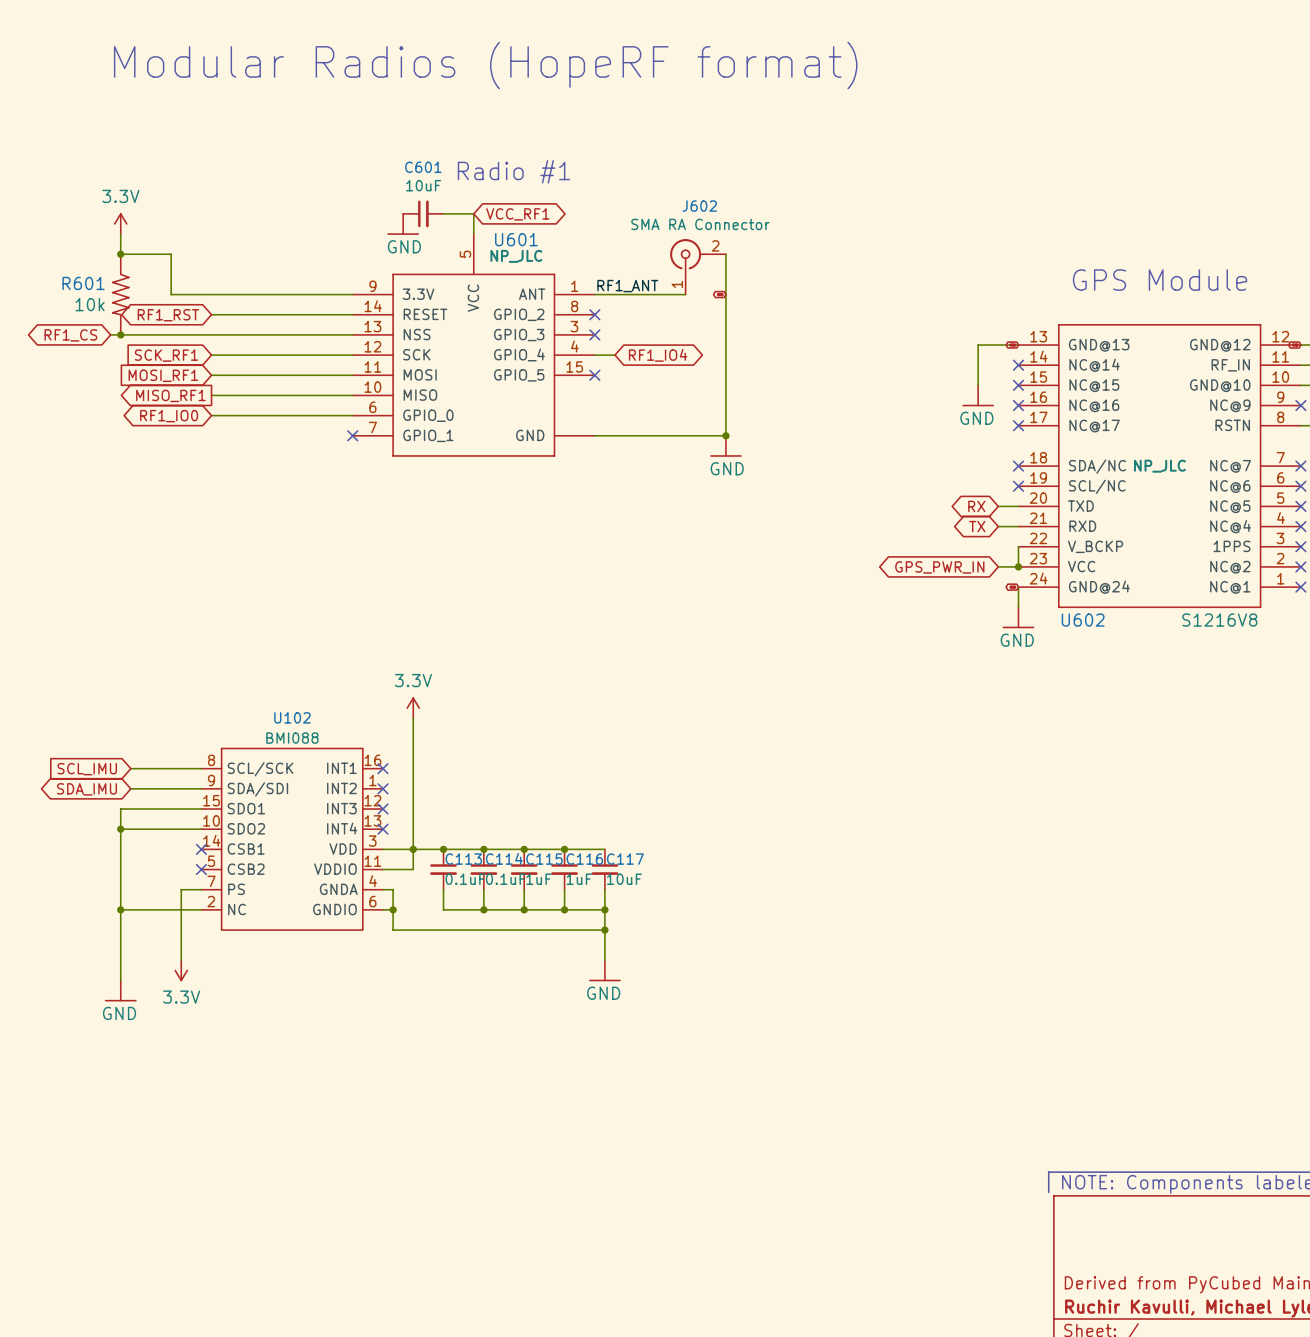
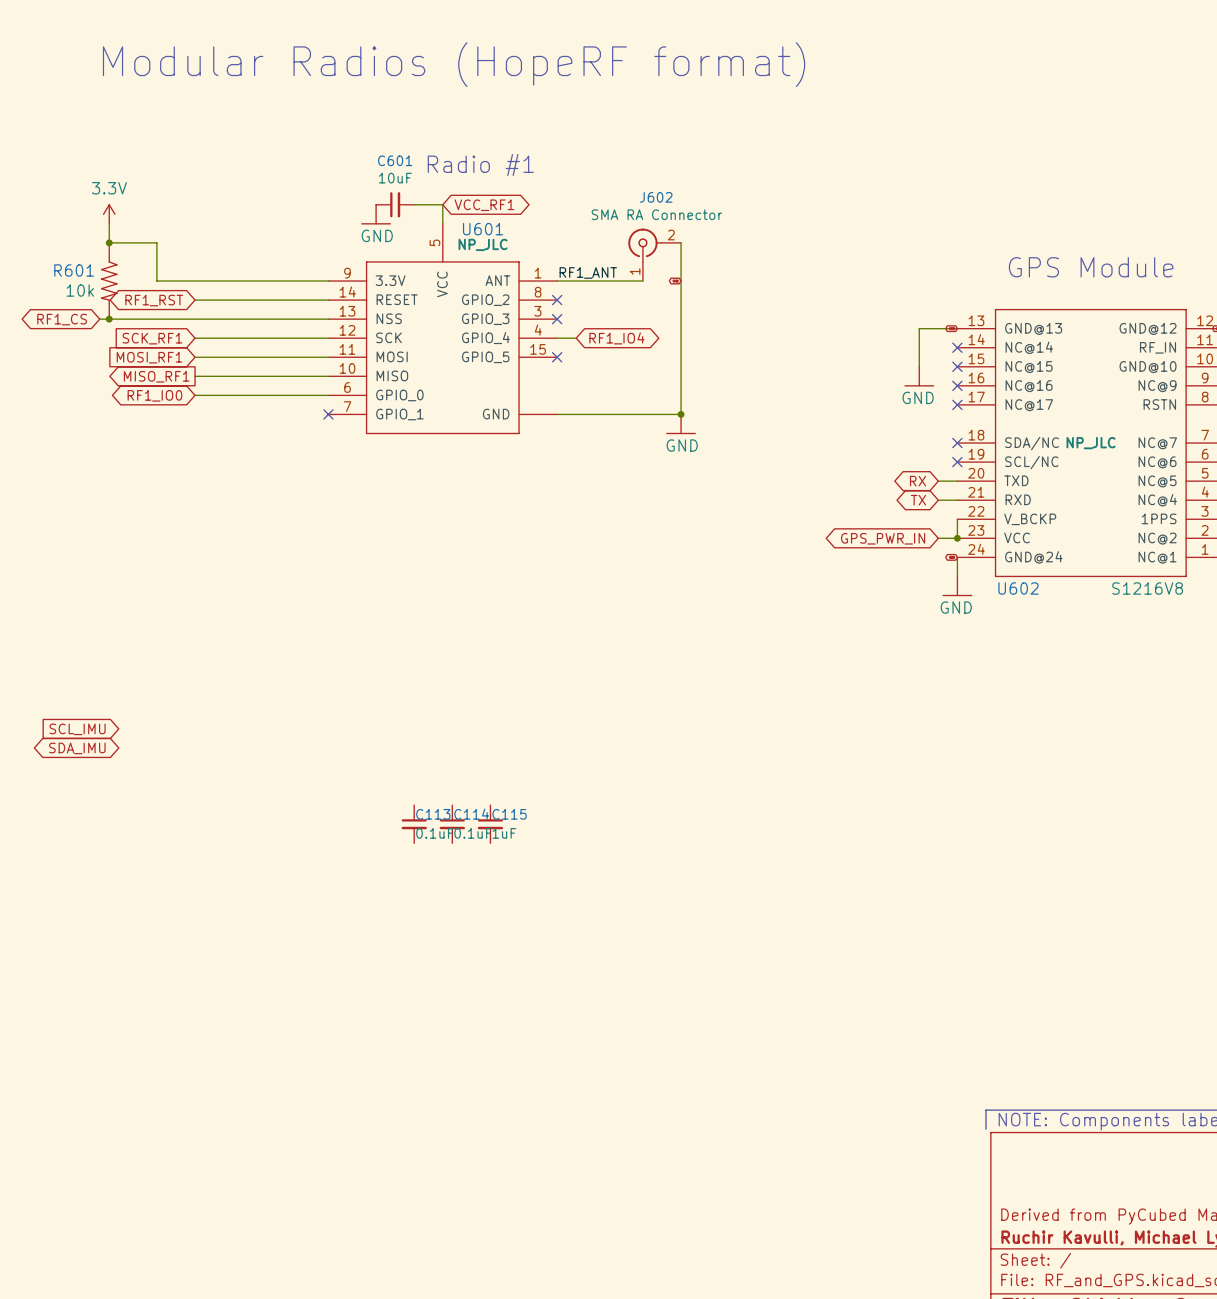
power symbol: 3.3V (413, 708) -> none
wire: (413, 718) (413, 869) (383, 869) -> none
wire: (130, 768) (201, 768) -> none
no-connect mark: (383, 768) -> none
wire: (130, 788) (201, 788) -> none
no-connect mark: (383, 788) -> none
wire: (201, 809) (120, 809) (120, 980) -> none
no-connect mark: (383, 809) -> none
wire: (120, 829) (201, 829) -> none
junction: (120, 829) -> none
no-connect mark: (383, 829) -> none
U102: BMI088 (292, 839) -> none
no-connect mark: (201, 849) -> none
wire: (383, 849) (604, 849) -> none
junction: (413, 849) -> none
junction: (443, 849) -> none
junction: (483, 849) -> none
junction: (524, 849) -> none
junction: (564, 849) -> none
no-connect mark: (201, 869) -> none
C116: 1uF (564, 869) -> none
C117: 10uF (604, 869) -> none
wire: (201, 889) (181, 889) (181, 960) -> none
wire: (383, 889) (393, 889) (393, 930) (604, 930) -> none
wire: (443, 889) (443, 909) (604, 909) -> none
wire: (483, 889) (483, 909) -> none
wire: (524, 889) (524, 909) -> none
wire: (564, 889) (564, 909) -> none
wire: (604, 889) (604, 960) -> none
wire: (120, 909) (201, 909) -> none
junction: (120, 909) -> none
wire: (383, 909) (393, 909) -> none
junction: (393, 909) -> none
junction: (483, 909) -> none
junction: (524, 909) -> none
junction: (564, 909) -> none
junction: (604, 909) -> none
junction: (604, 930) -> none
power symbol: 3.3V (181, 970) -> none
power symbol: GND (604, 970) -> none
power symbol: GND (120, 990) -> none

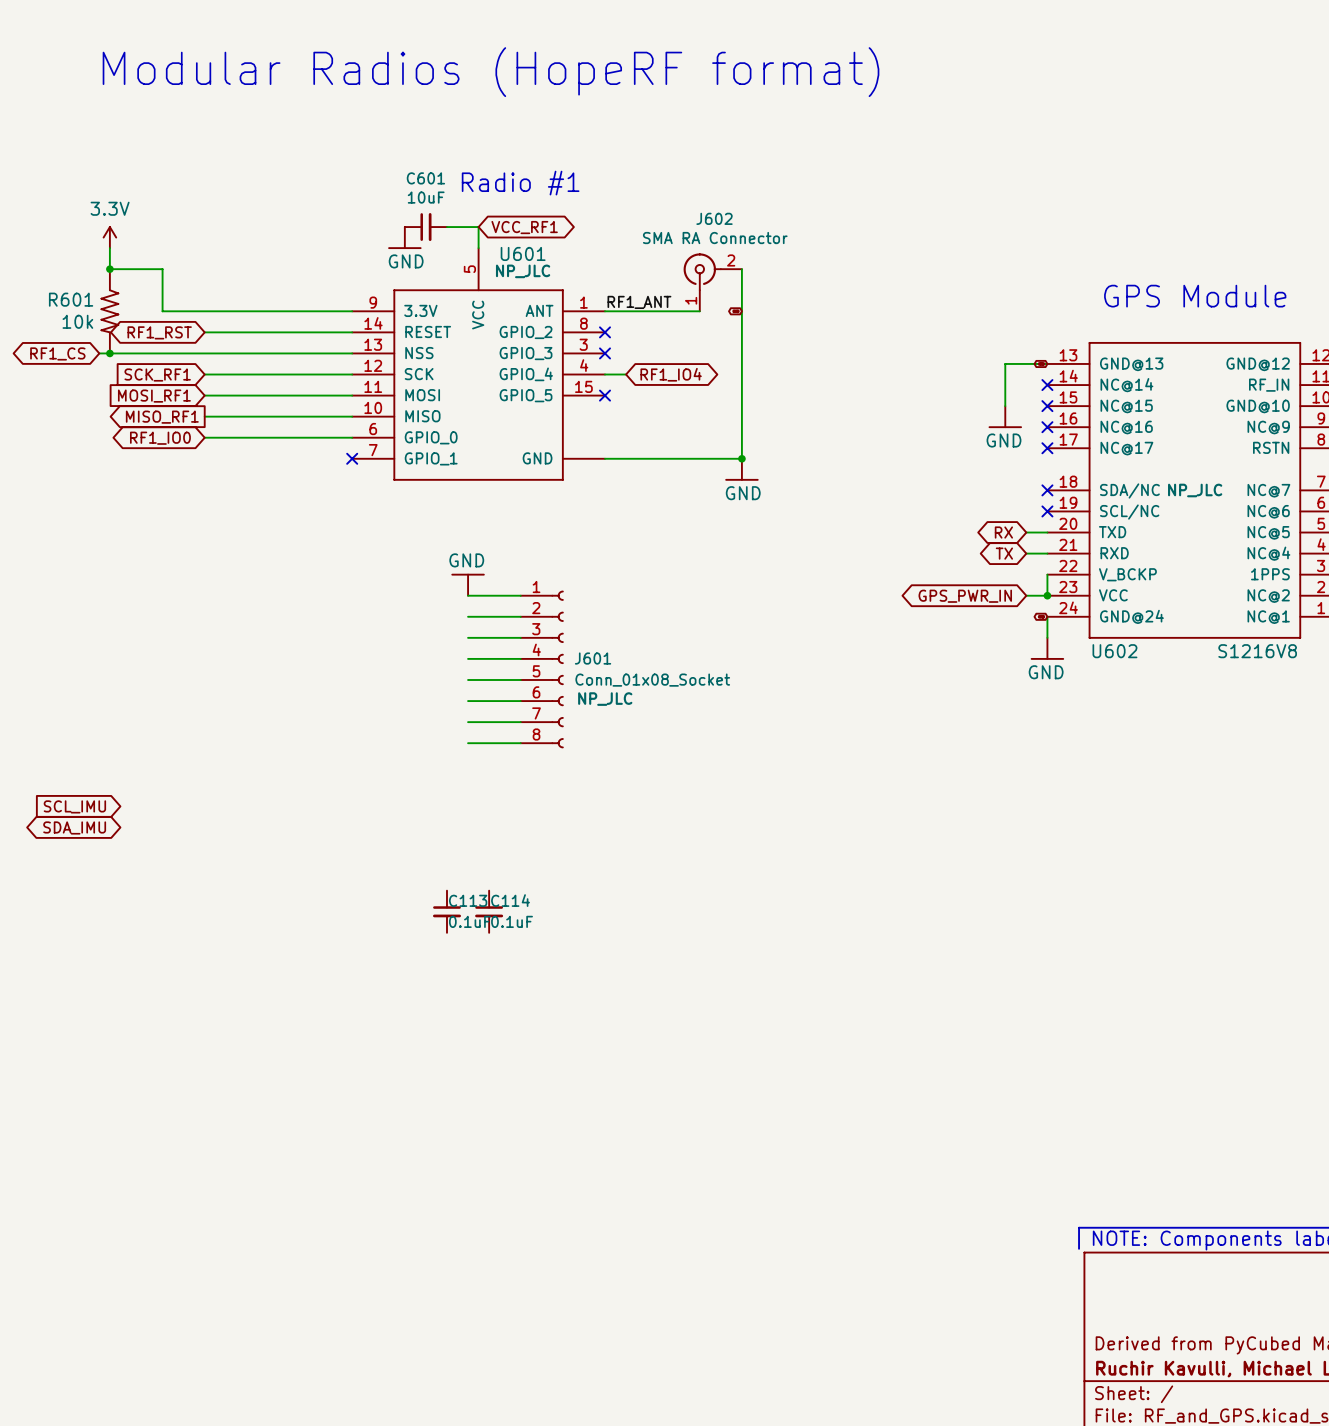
power symbol: none -> GND (468, 585)
wire: none -> (468, 595) (520, 595)
wire: none -> (468, 616) (520, 616)
wire: none -> (468, 637) (520, 637)
wire: none -> (468, 658) (520, 658)
J601: none -> Conn_01x08_Socket (542, 669)
wire: none -> (468, 679) (520, 679)
wire: none -> (468, 701) (520, 701)
wire: none -> (468, 722) (520, 722)
wire: none -> (468, 743) (520, 743)
C115: 1uF (490, 824) -> none

